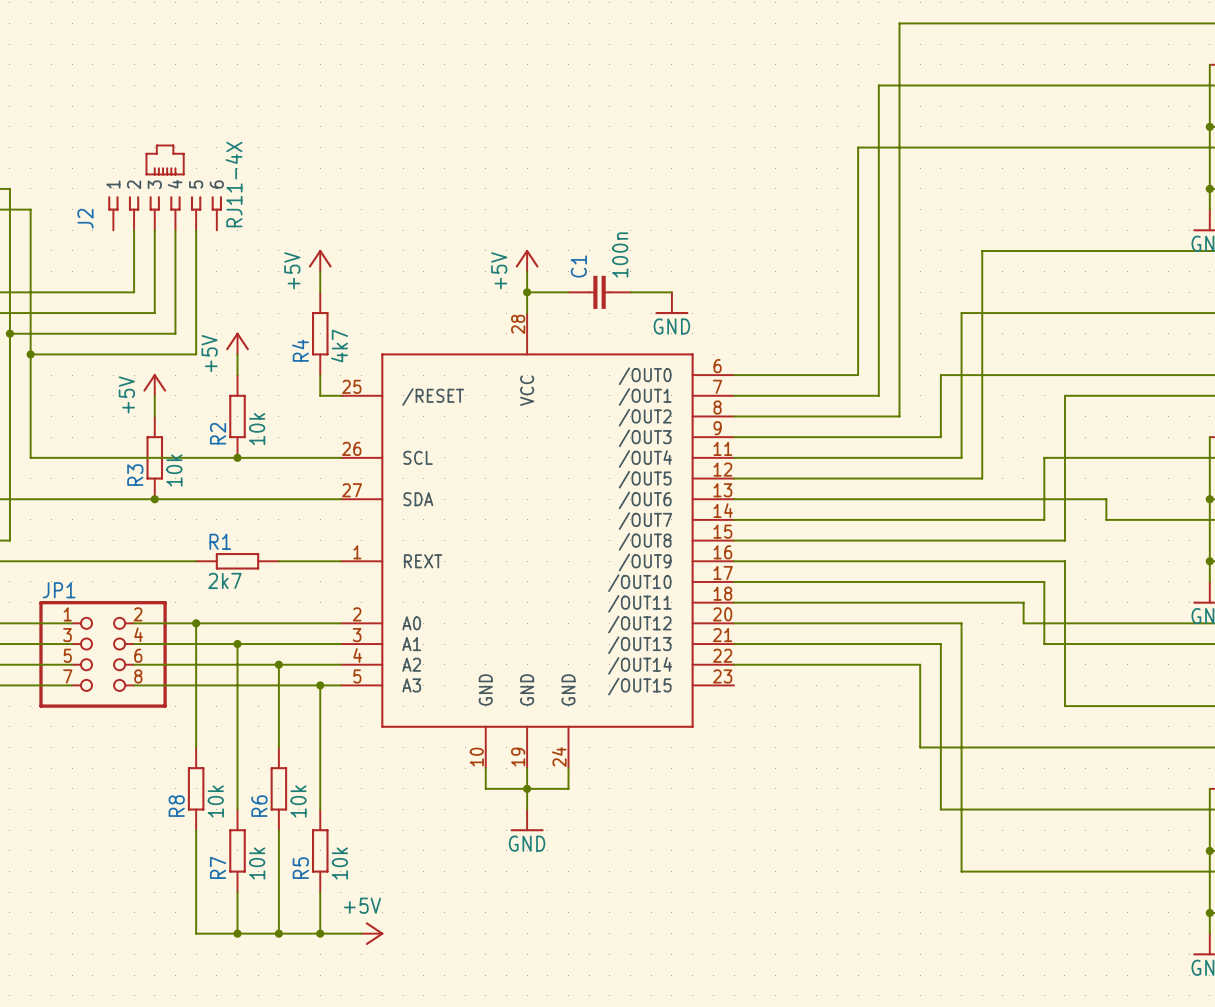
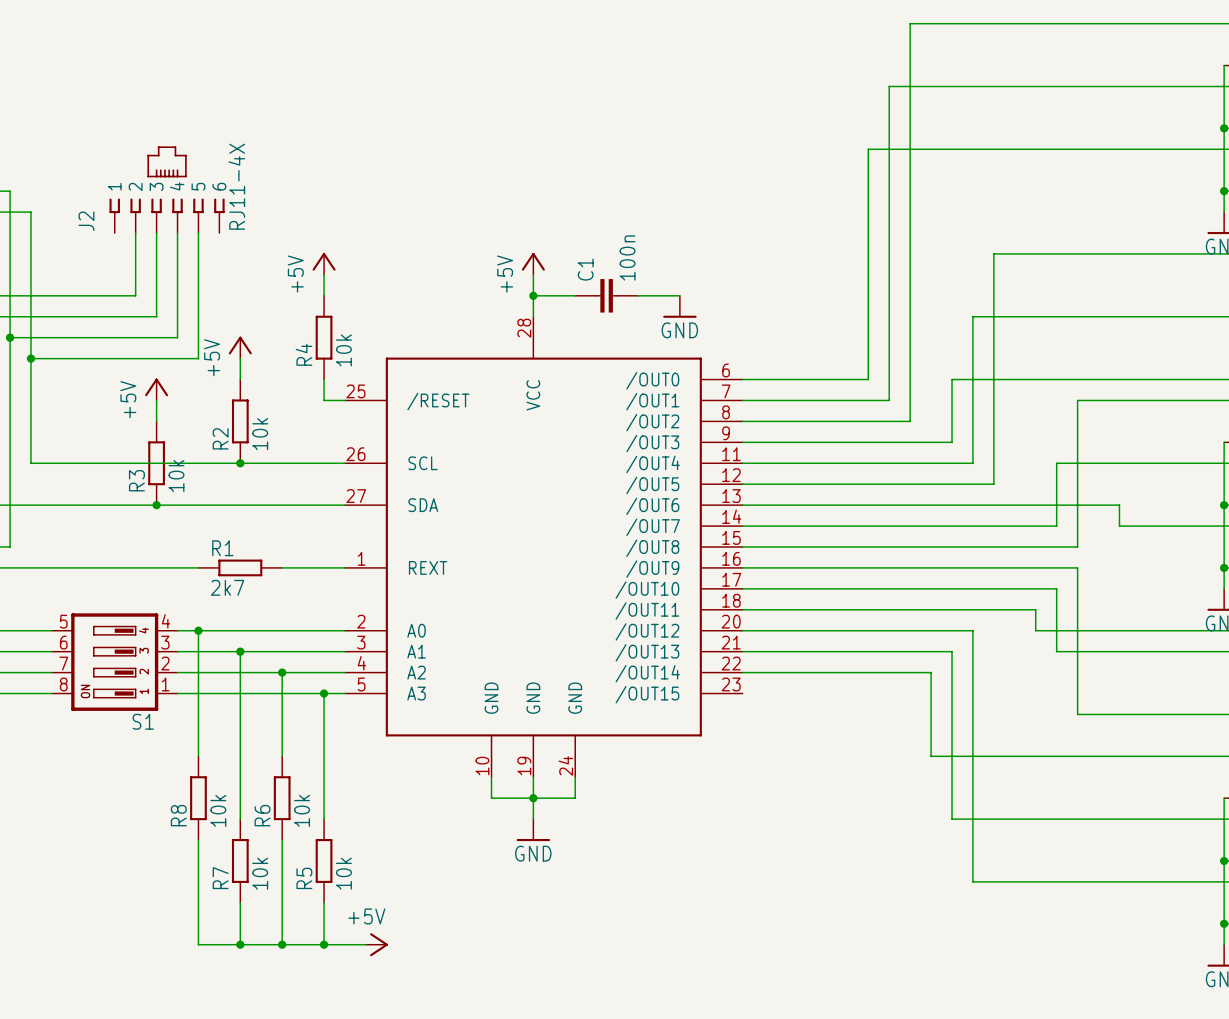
R4 value: 4k7 (339, 346) -> 10k (343, 350)
JP1: (103, 654) -> none
S1: none -> (114, 662)

